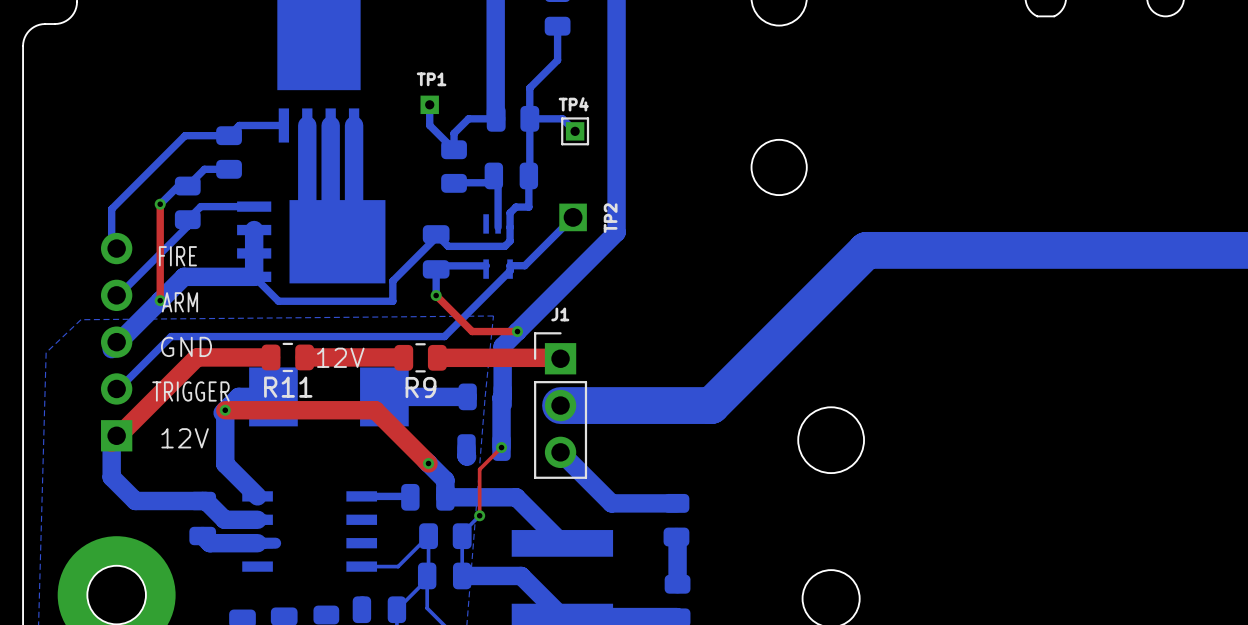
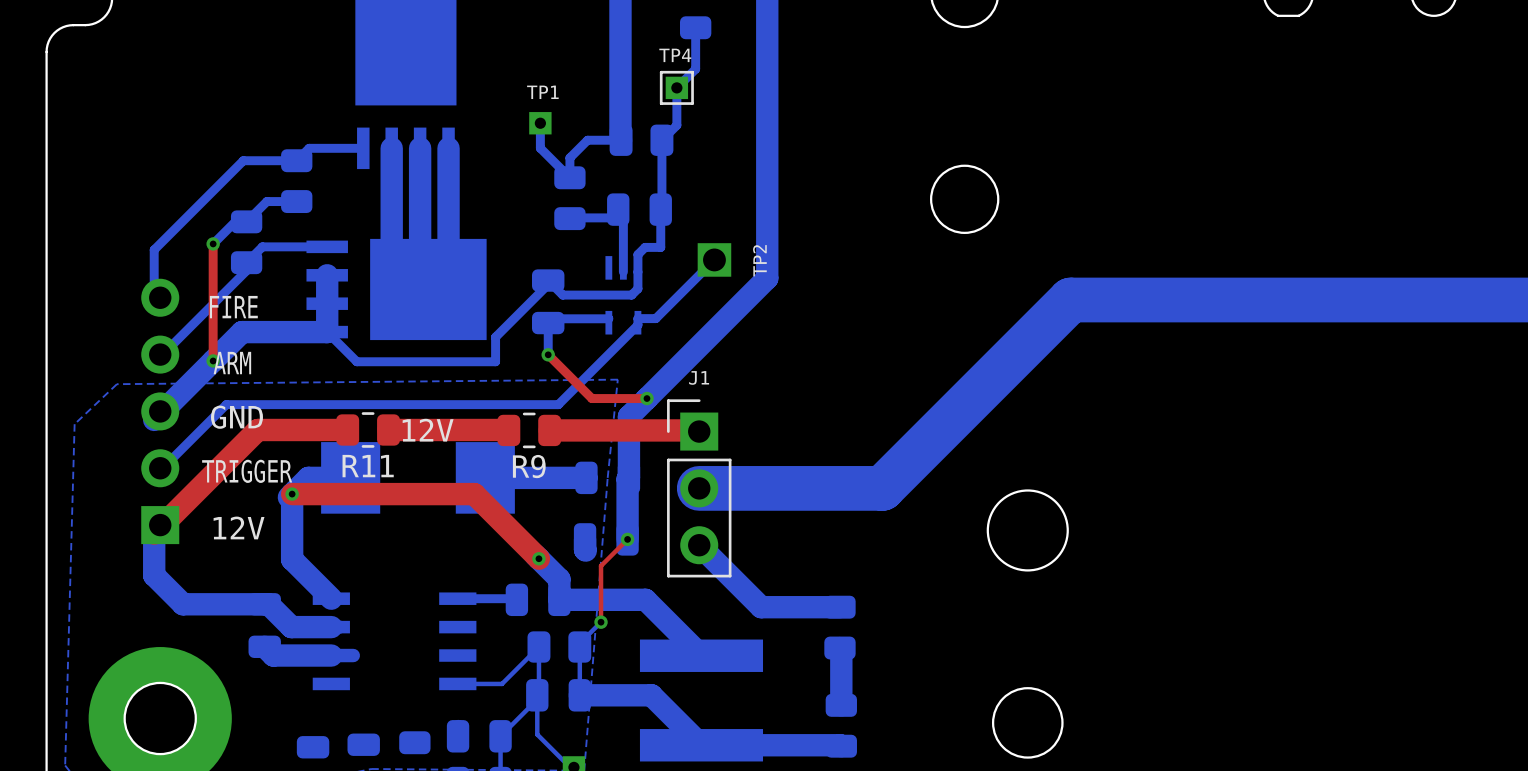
bottom track: (542, 75) (529, 88) (529, 118) (562, 118) (575, 131) -> (676, 87) (676, 125) (661, 140)
TP4 position: (575, 131) -> (676, 87)

